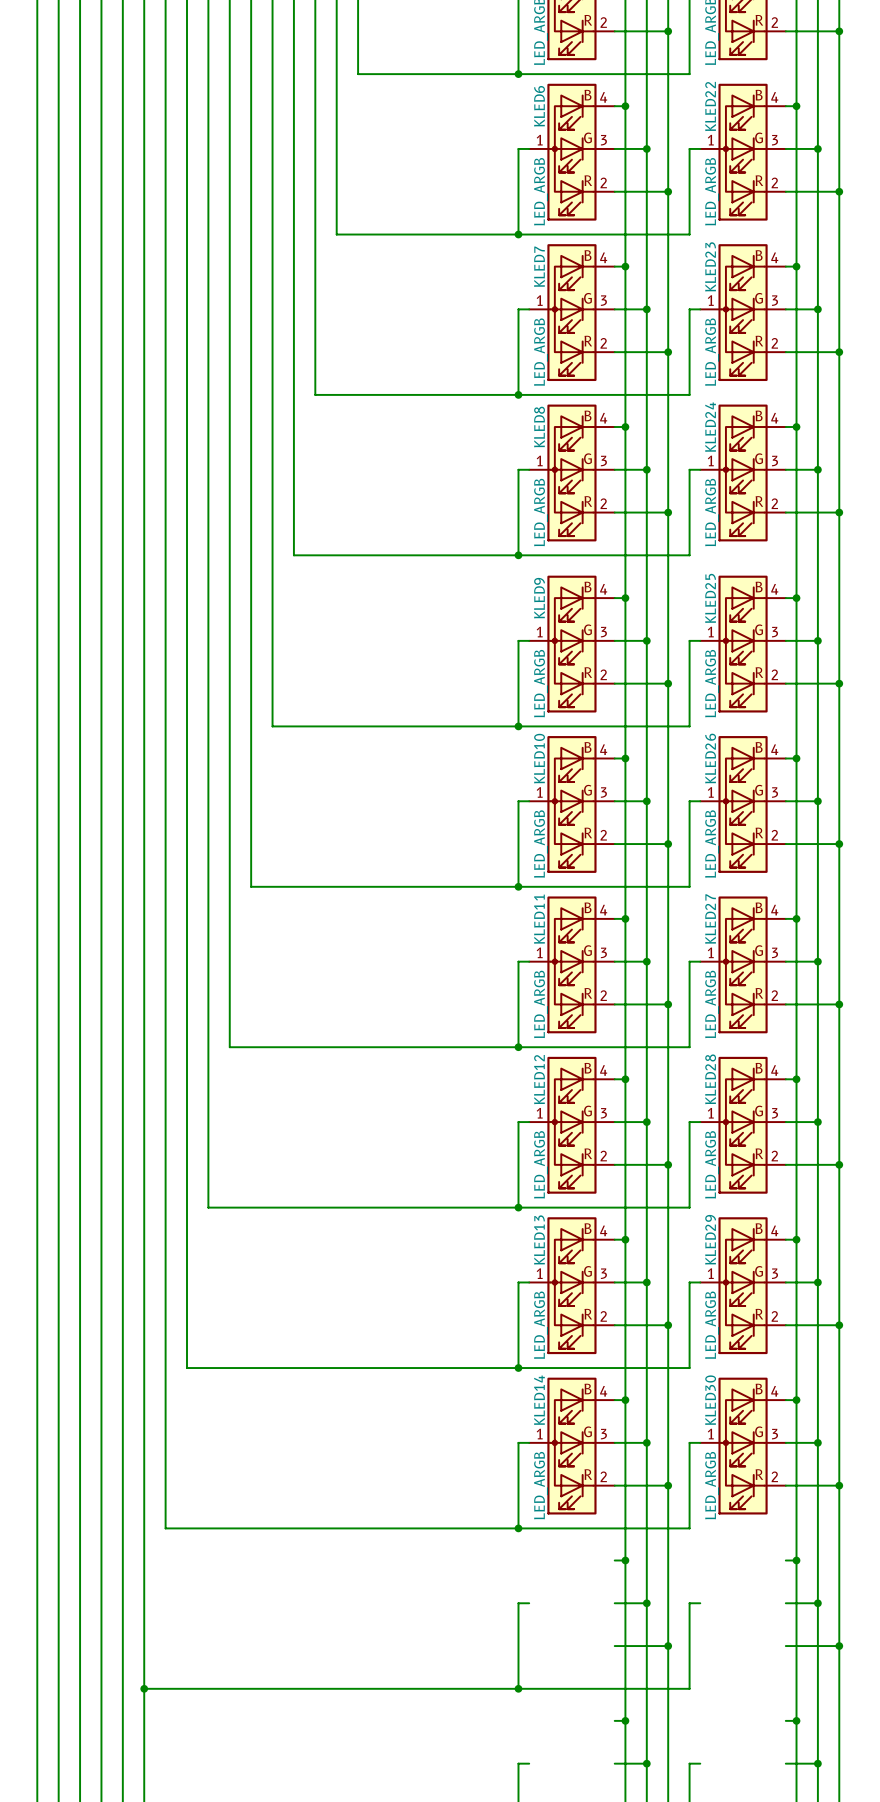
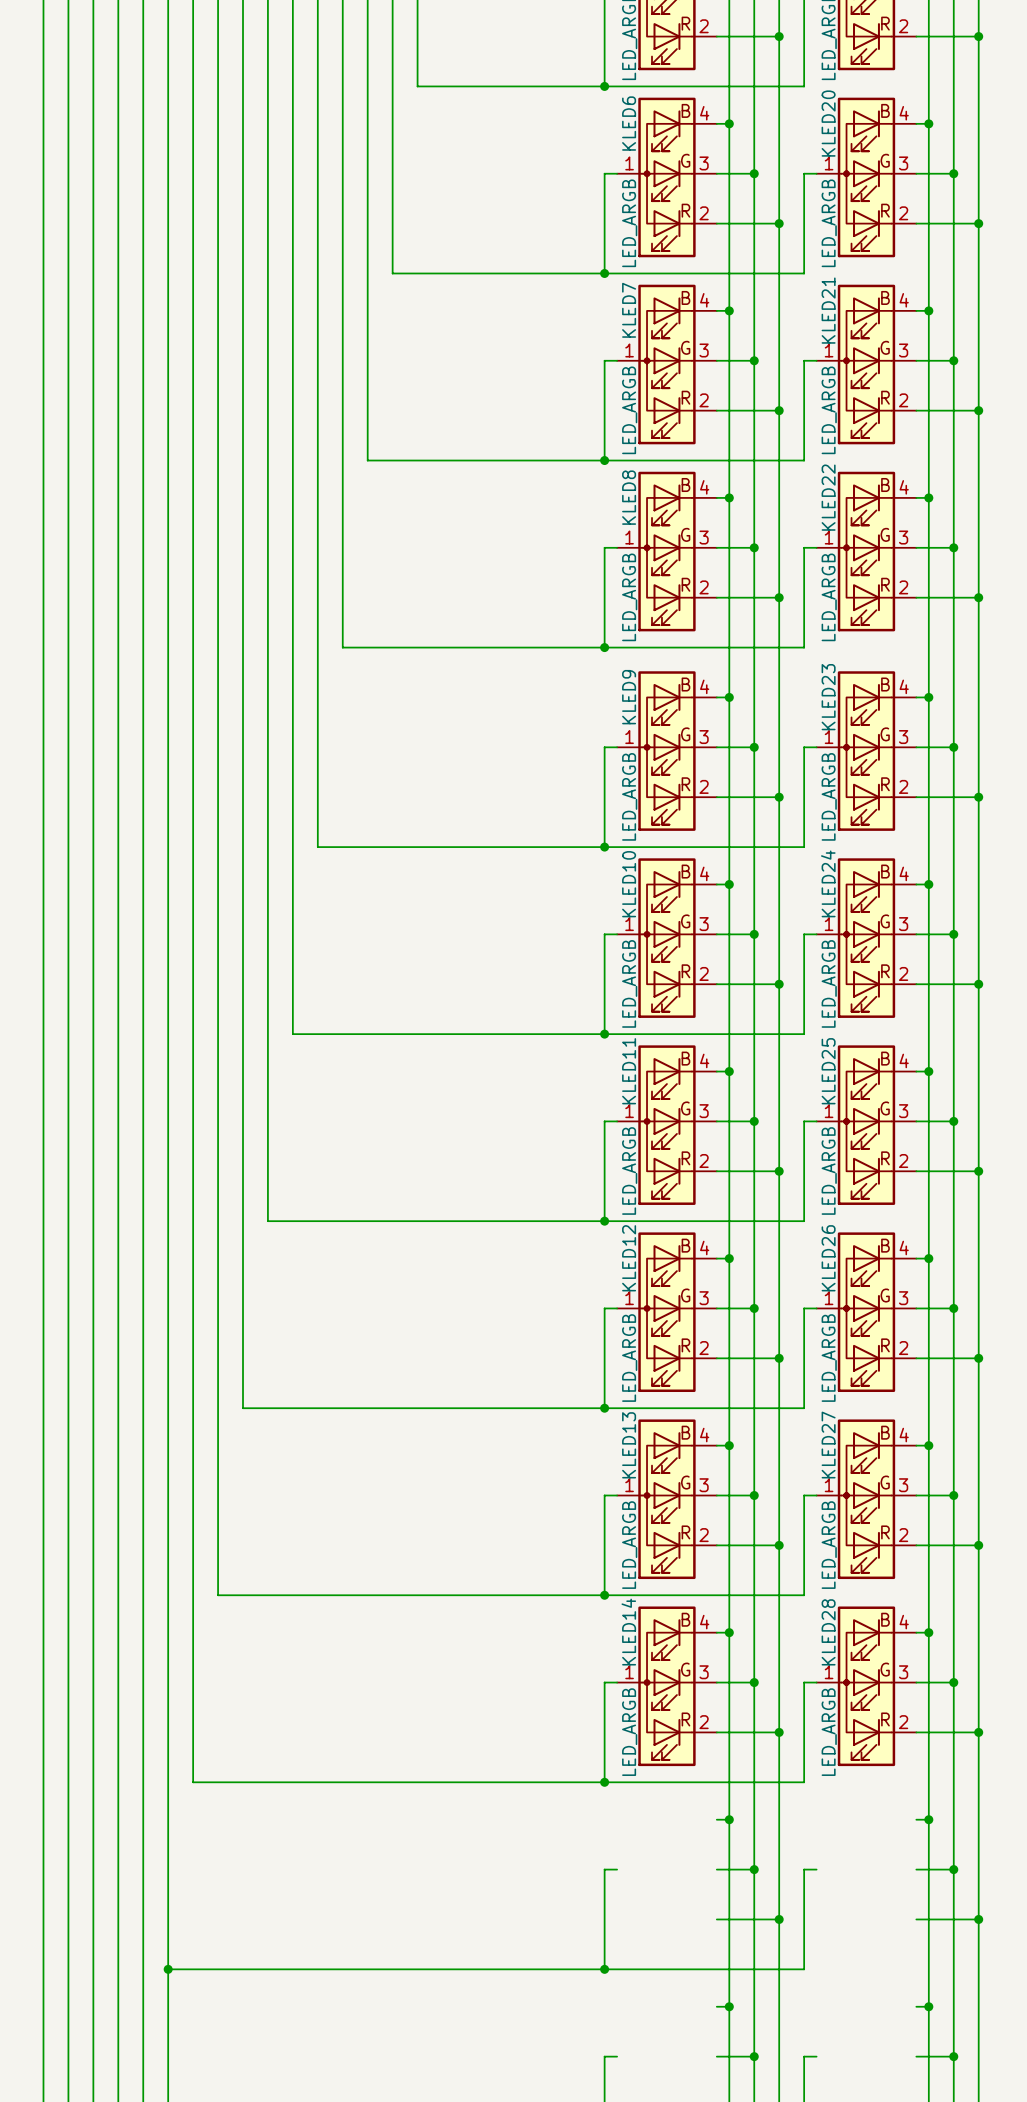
KLED22 name: KLED22 (710, 106) -> KLED20 (828, 123)
KLED23 name: KLED23 (710, 266) -> KLED21 (828, 310)
KLED24 name: KLED24 (710, 427) -> KLED22 (828, 497)
KLED25 name: KLED25 (710, 598) -> KLED23 (828, 697)
KLED26 name: KLED26 (710, 758) -> KLED24 (828, 883)
KLED27 name: KLED27 (710, 919) -> KLED25 (828, 1071)
KLED28 name: KLED28 (710, 1079) -> KLED26 (828, 1258)
KLED29 name: KLED29 (710, 1239) -> KLED27 (828, 1445)
KLED30 name: KLED30 (710, 1400) -> KLED28 (828, 1632)

